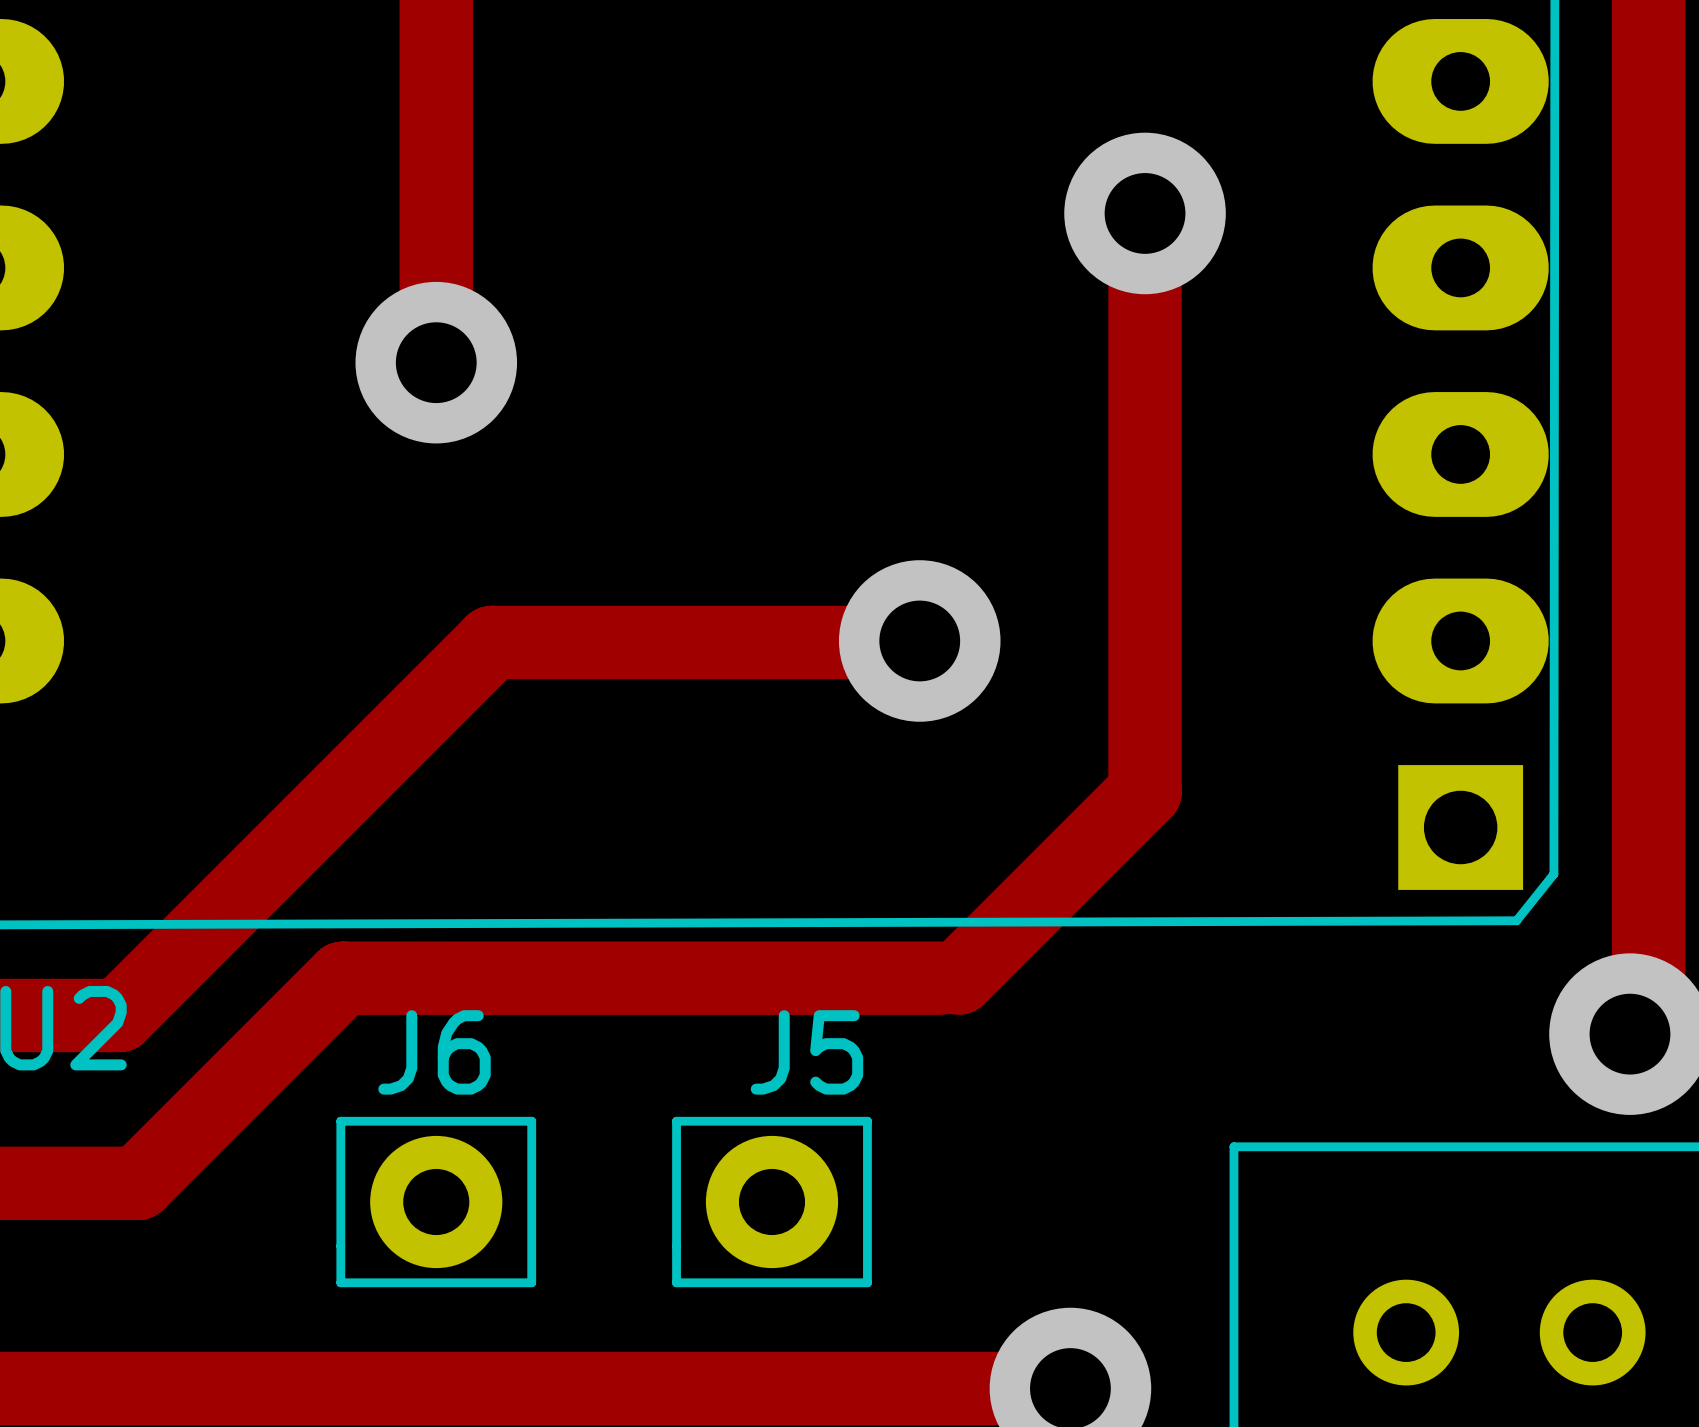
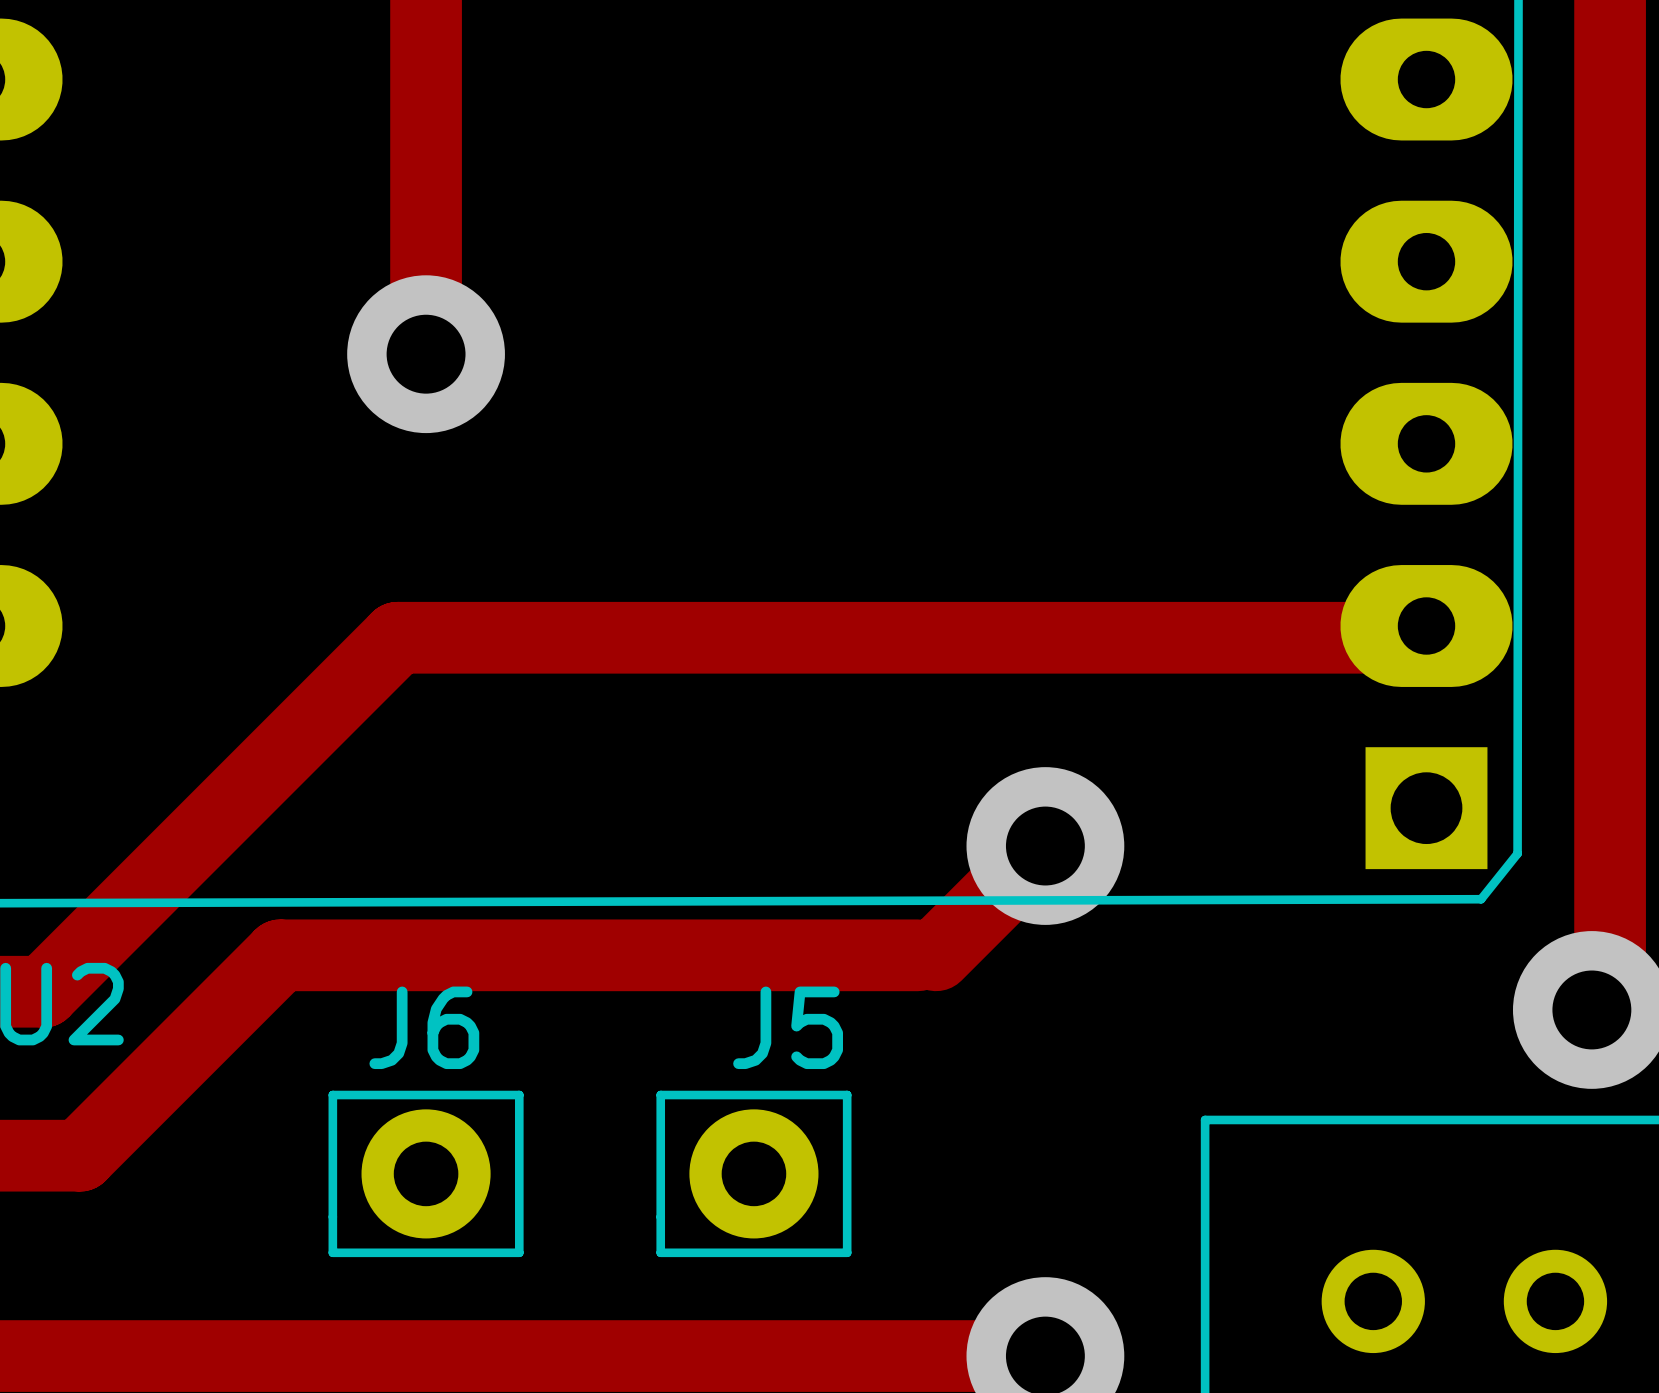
track: (1145, 213) (1145, 791) (1070, 866) -> none
via: (1145, 213) -> none
track: (919, 640) (492, 642) (119, 1015) (44, 1015) -> (1426, 625) (1414, 637) (397, 637) (43, 991)
via position: (919, 640) -> (1045, 846)
track: (343, 978) (137, 1183) (81, 1183) -> (334, 955) (280, 955) (79, 1155)

